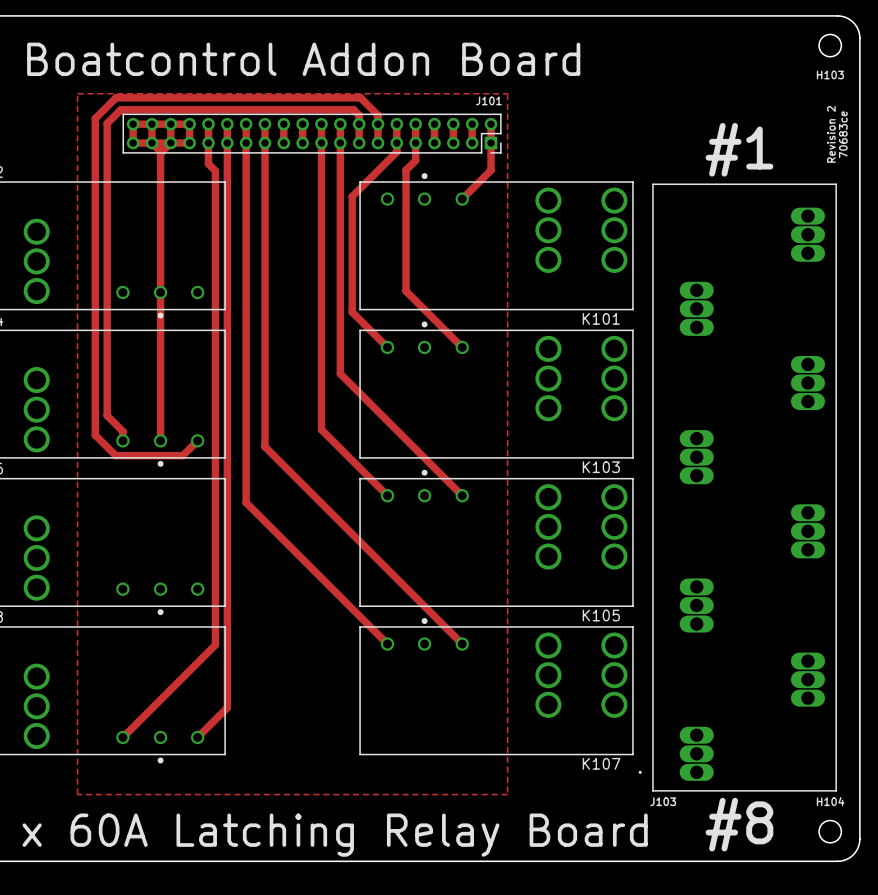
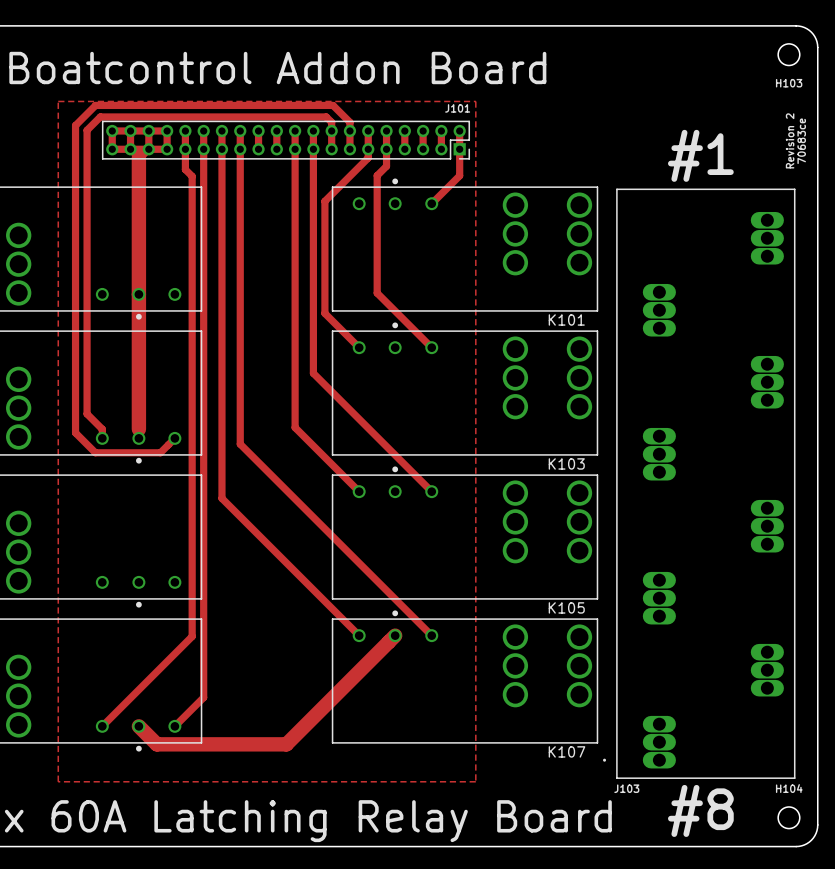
track width: thin (160, 151) (160, 431) -> thick (138, 157) (138, 429)
track: none -> (395, 635) (286, 744) (156, 744) (138, 726)

